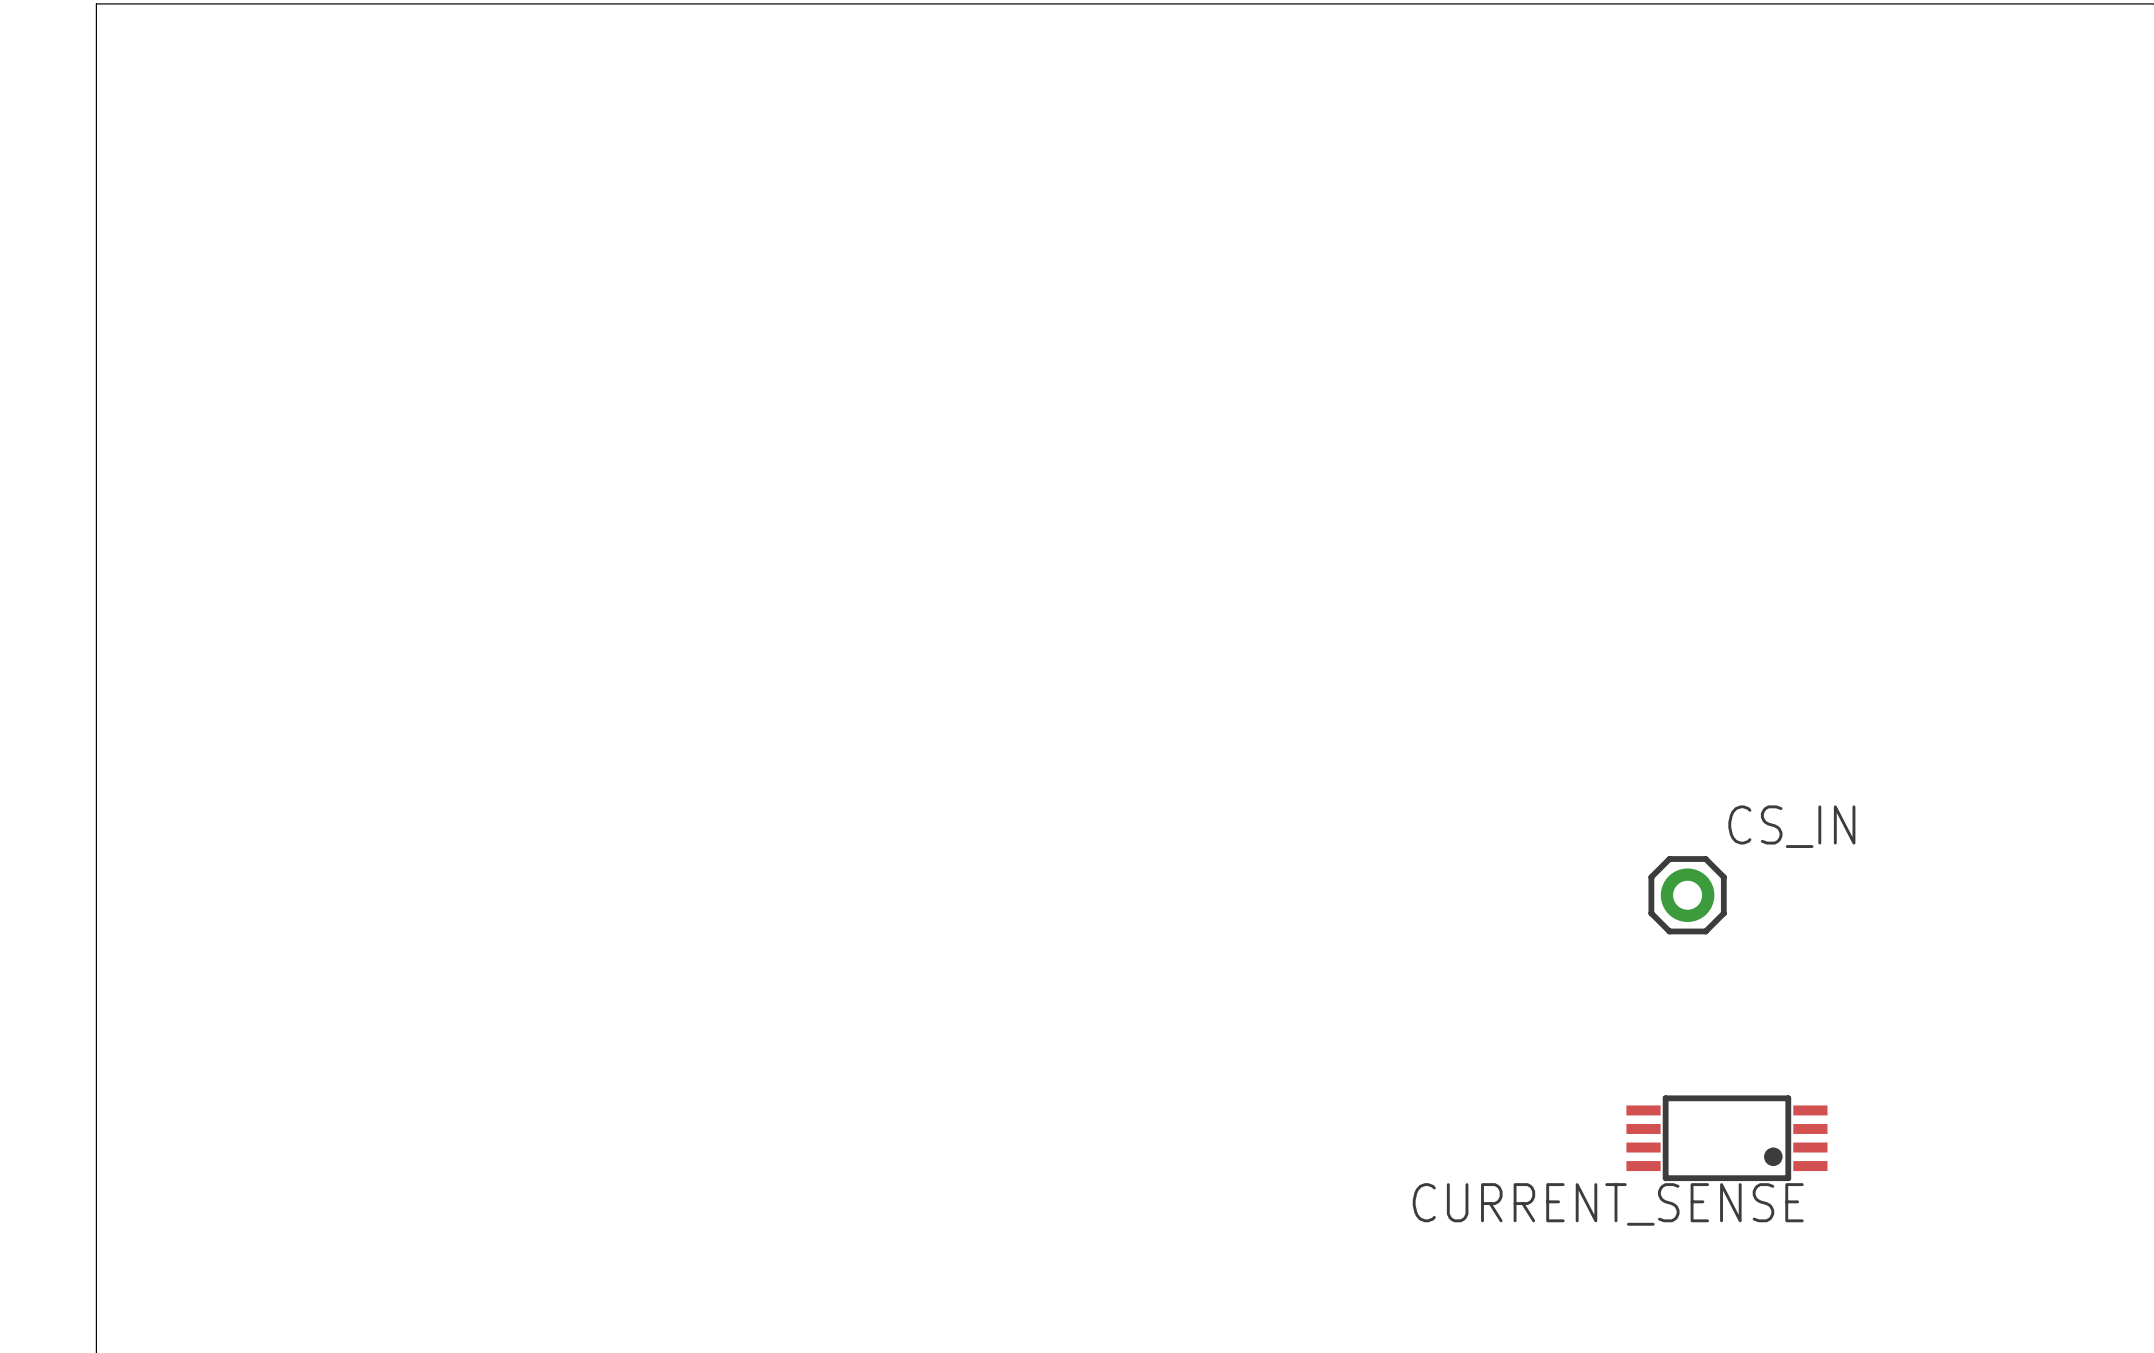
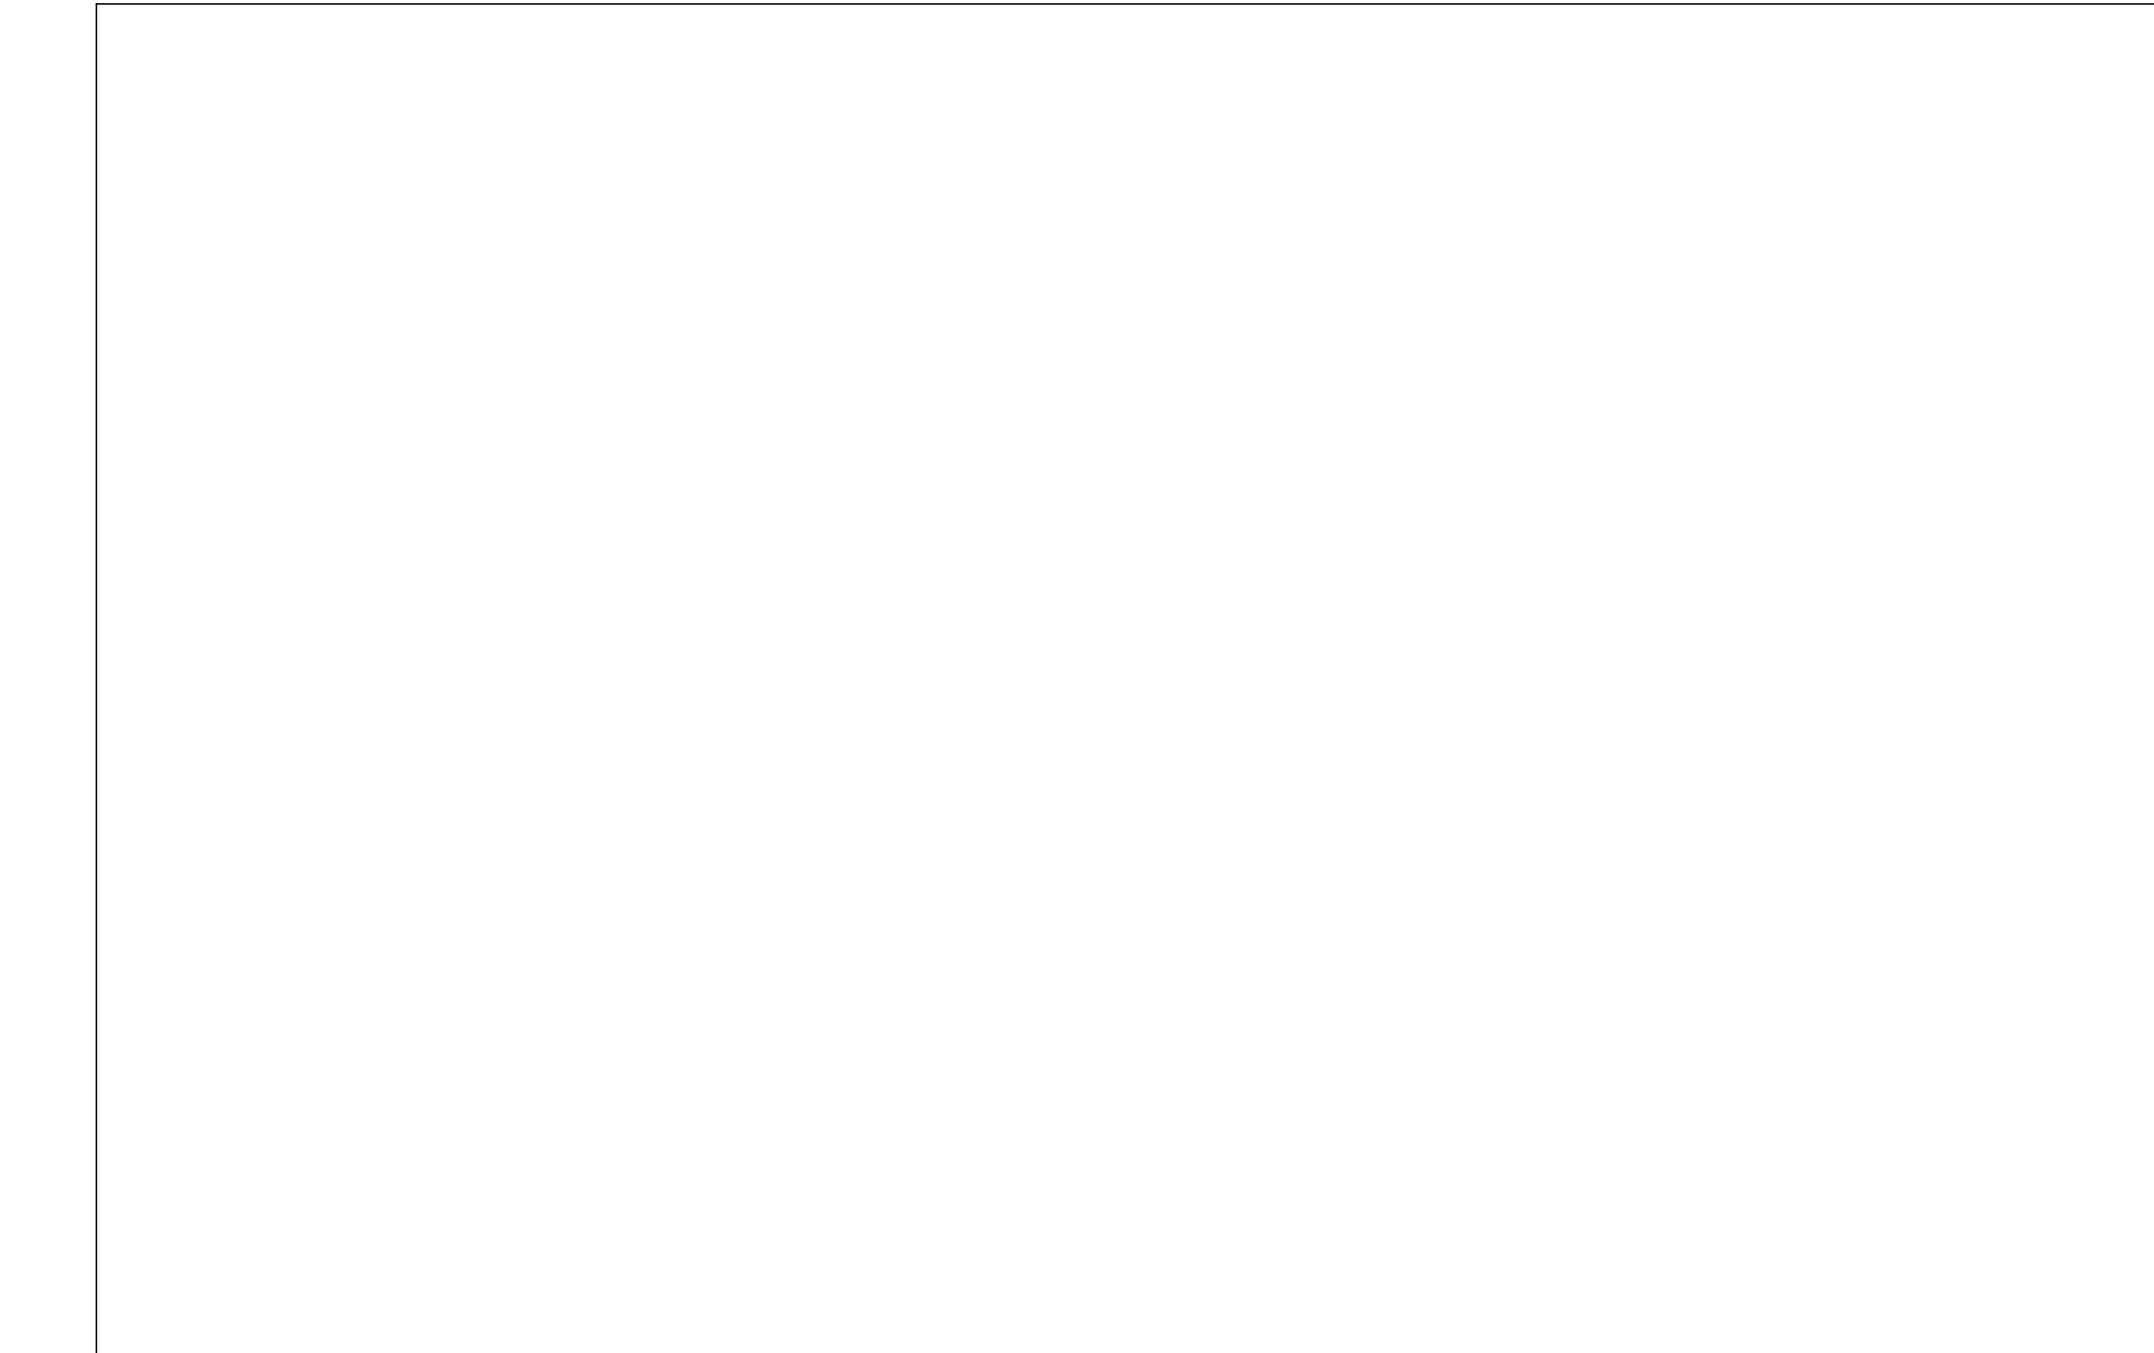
CS_IN: (1687, 895) -> none
CURRENT_SENSE: (1726, 1138) -> none

